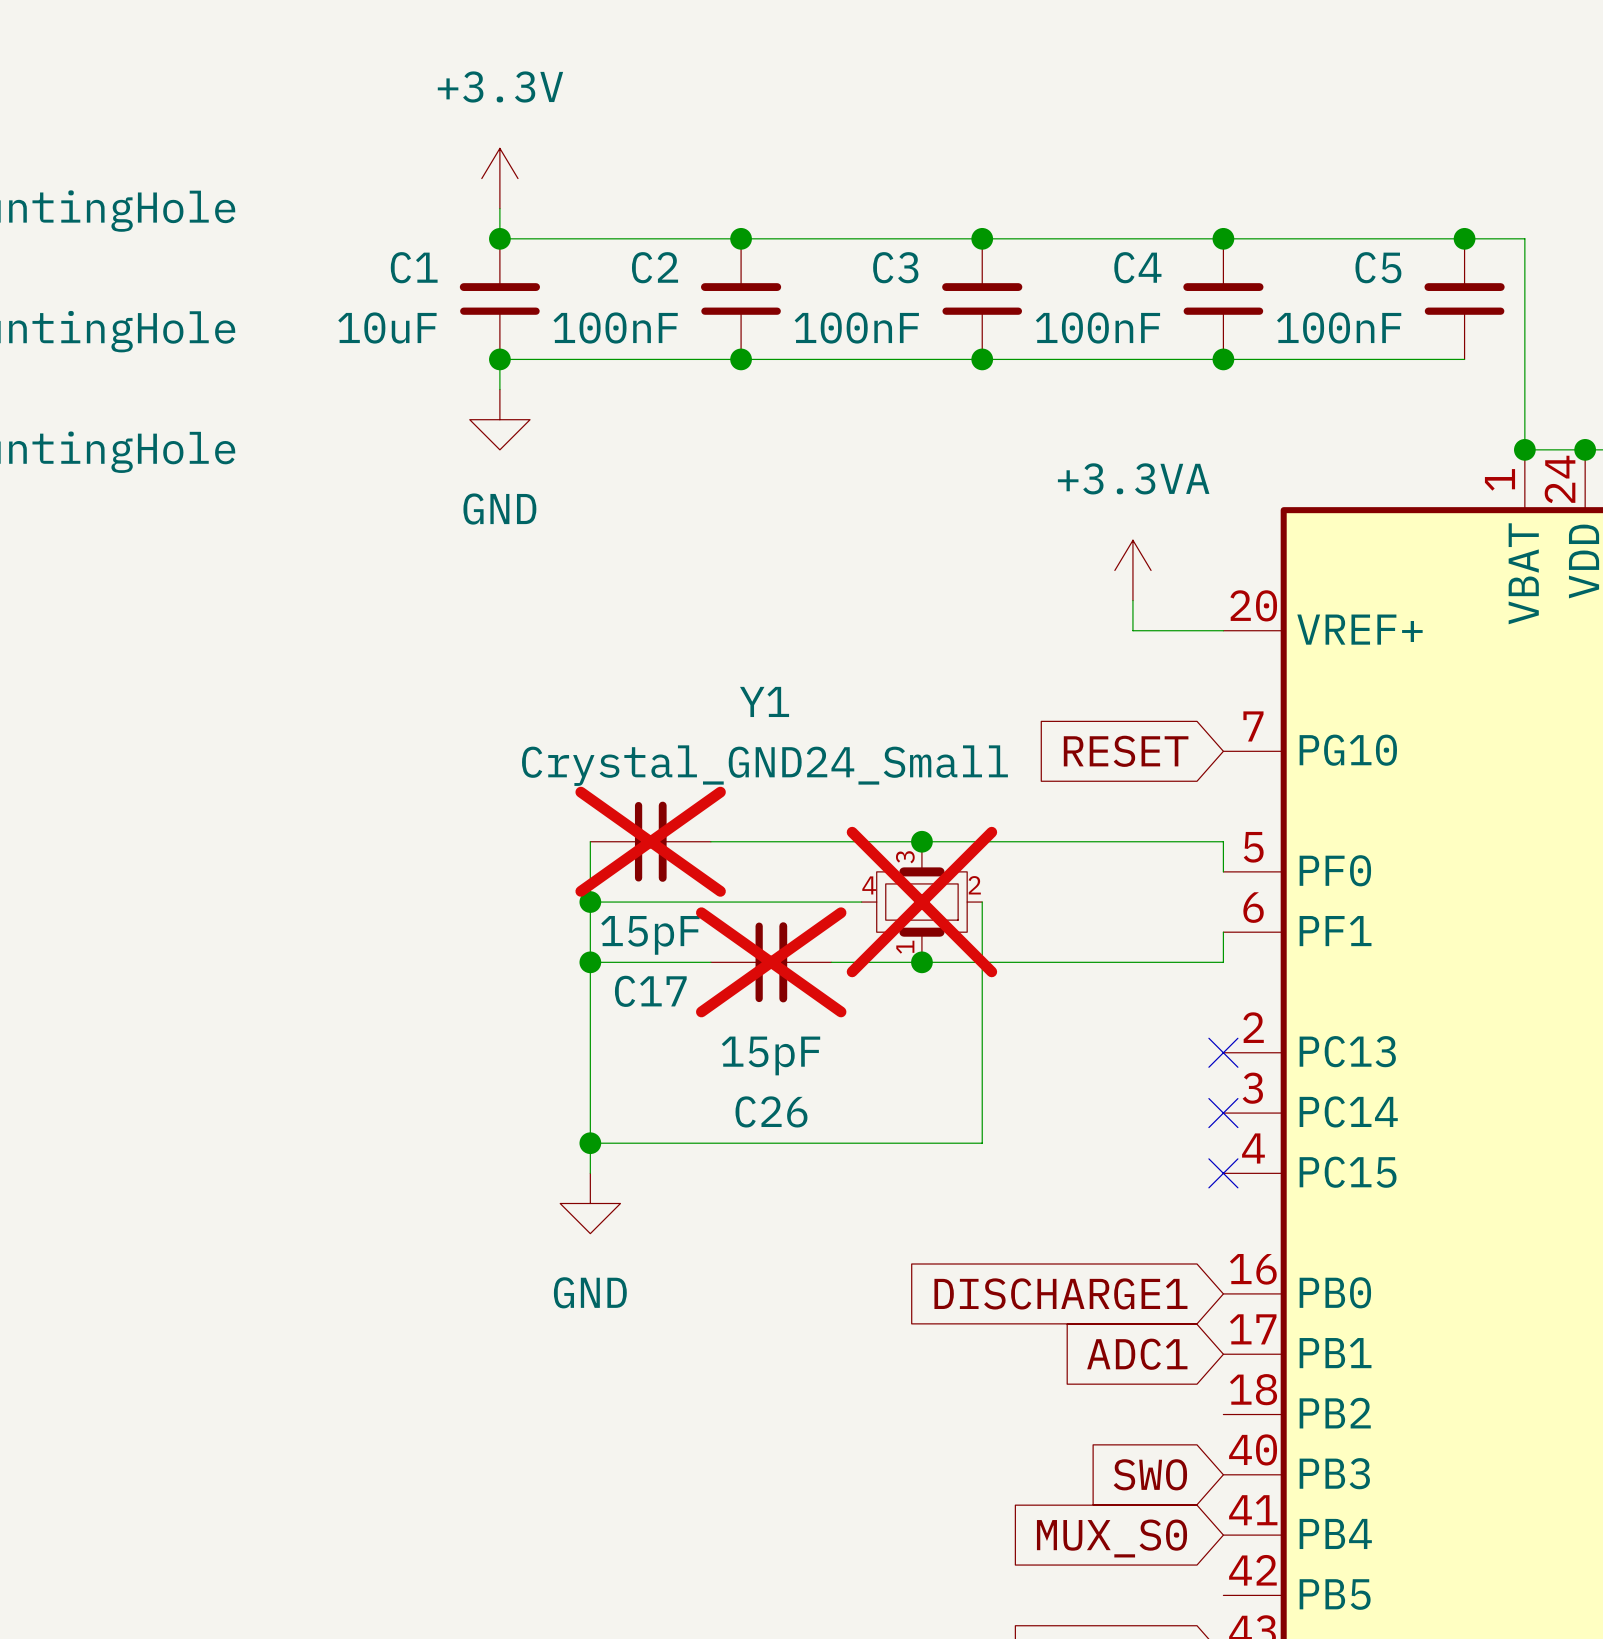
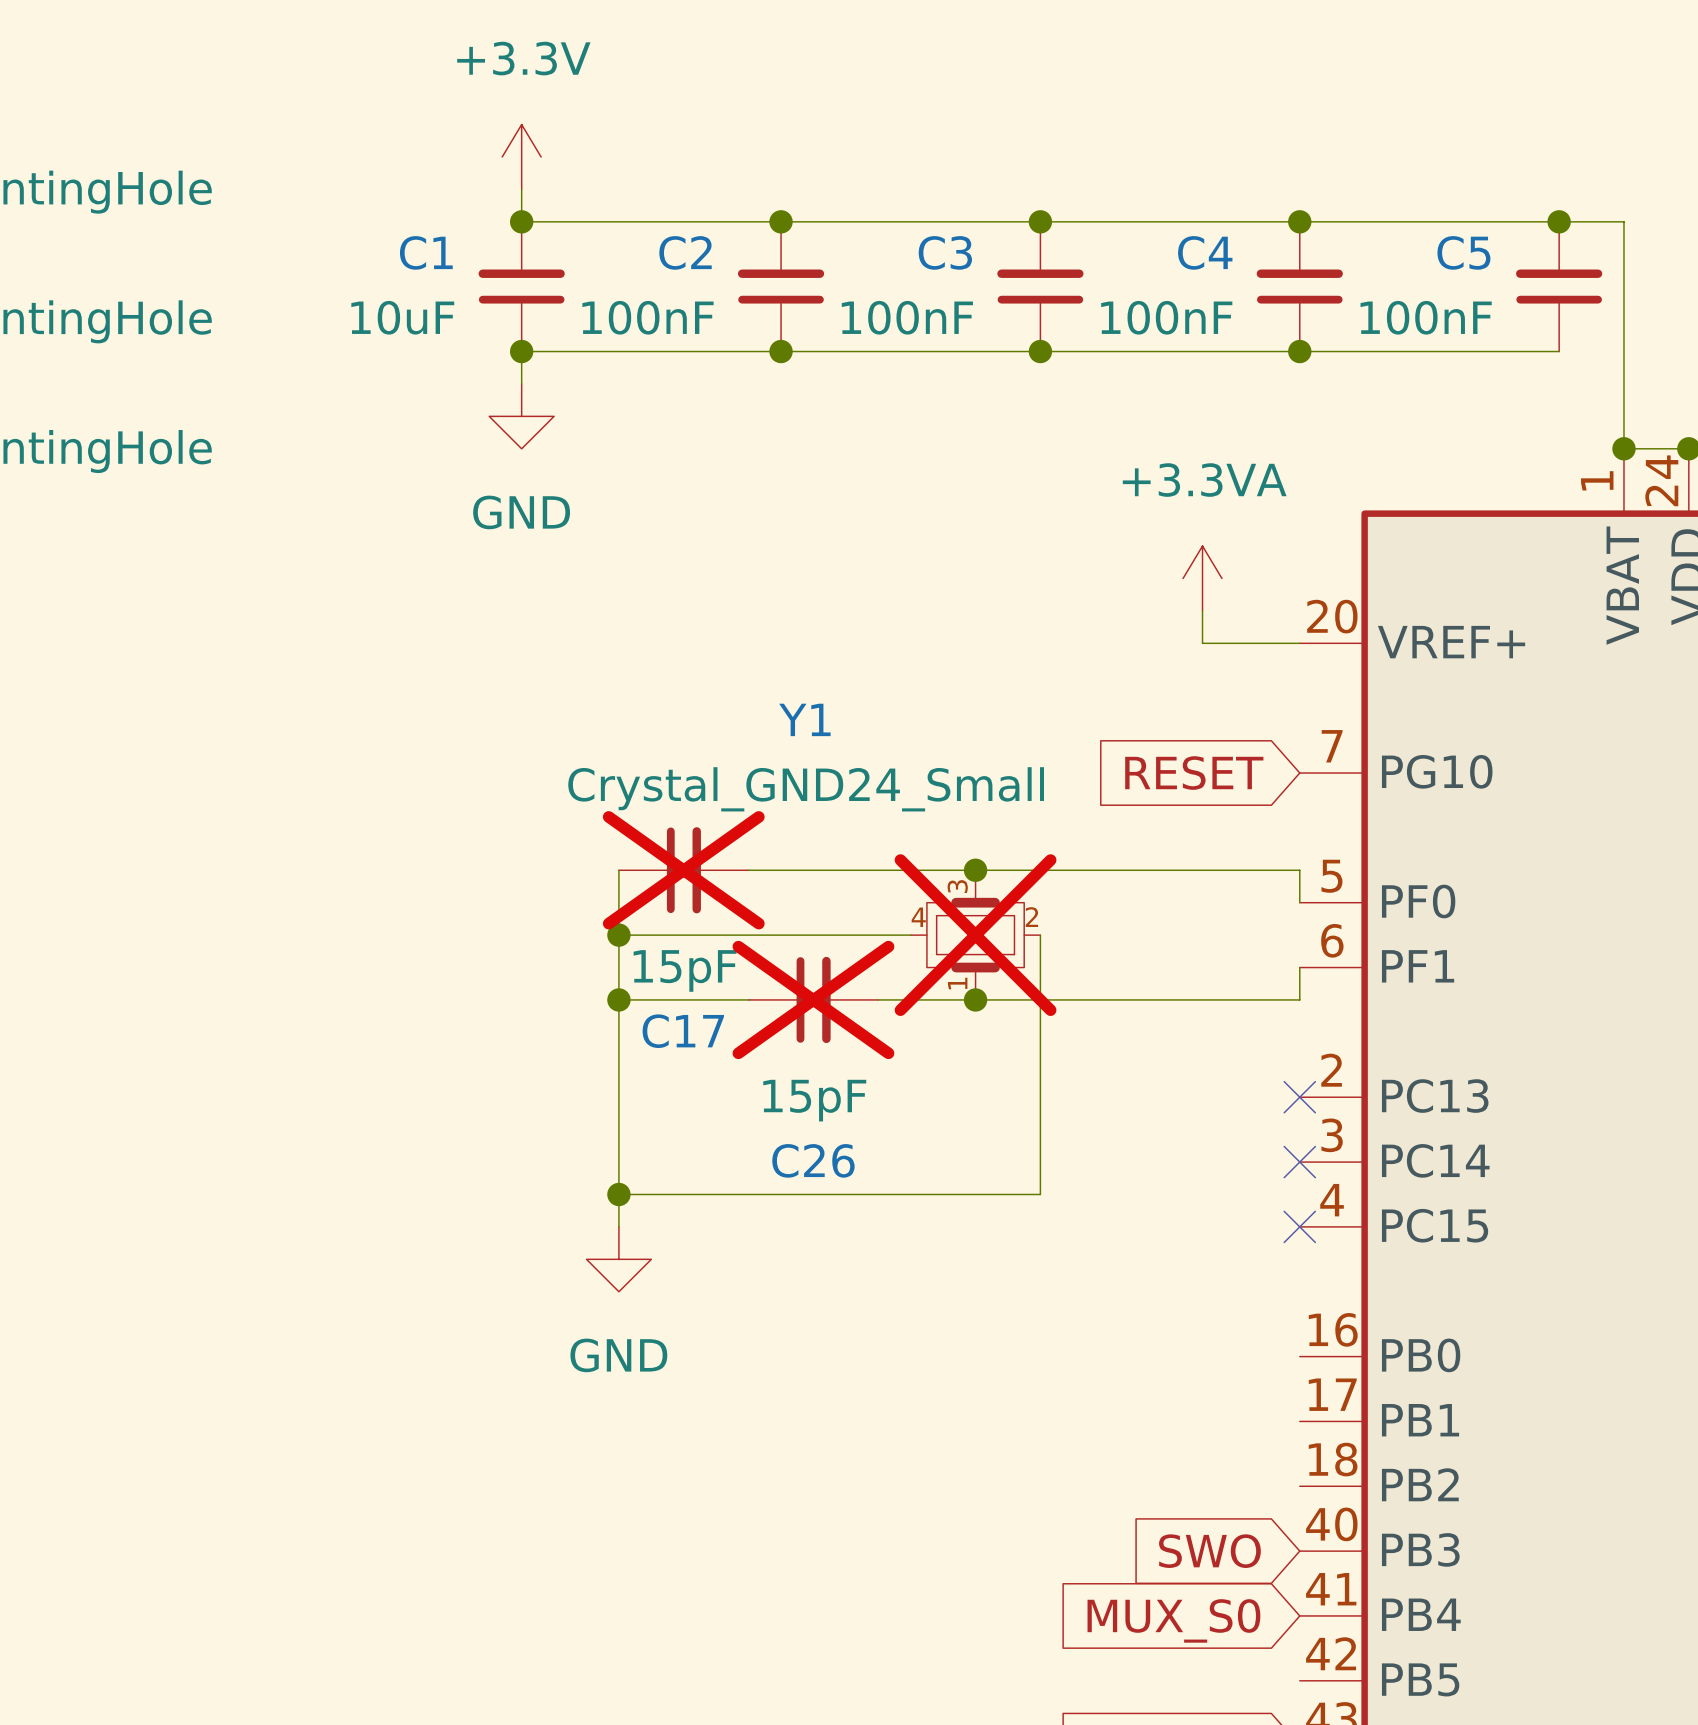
global label: DISCHARGE1 (1060, 1293) -> none
global label: ADC1 (1137, 1354) -> none

